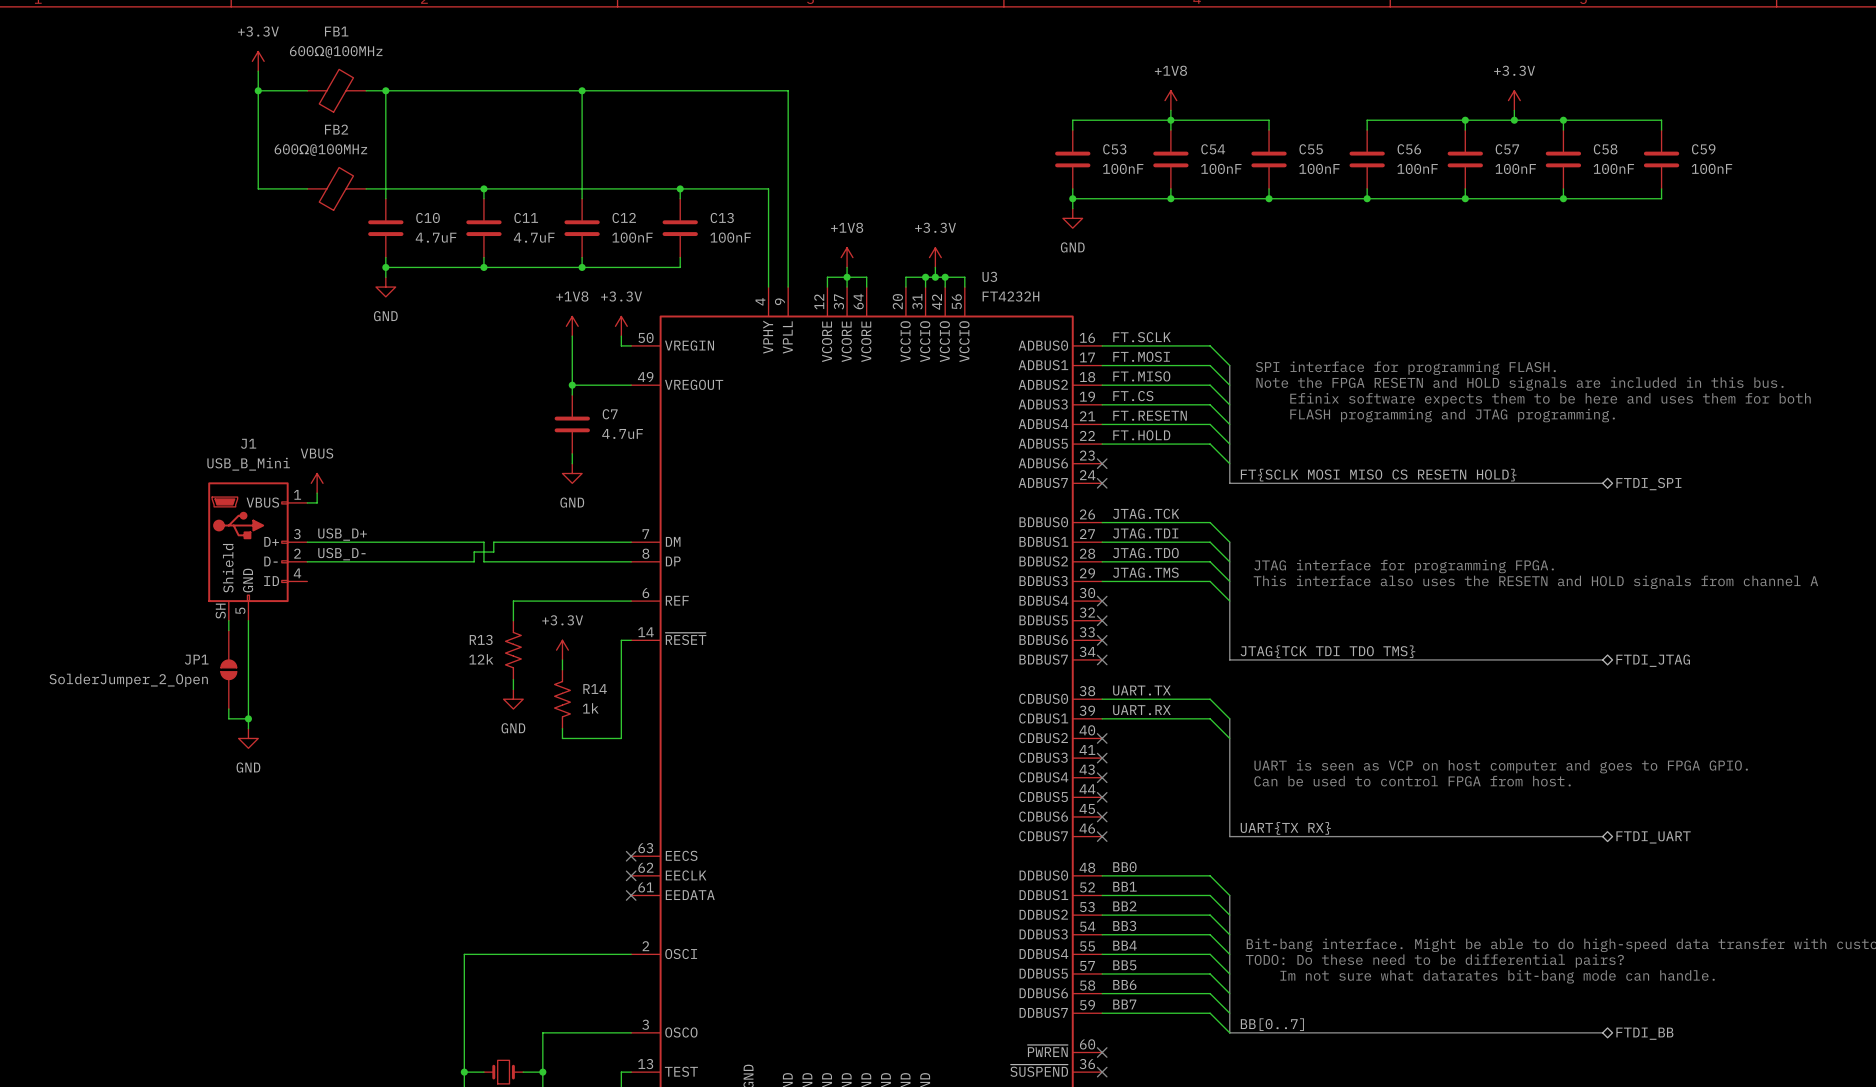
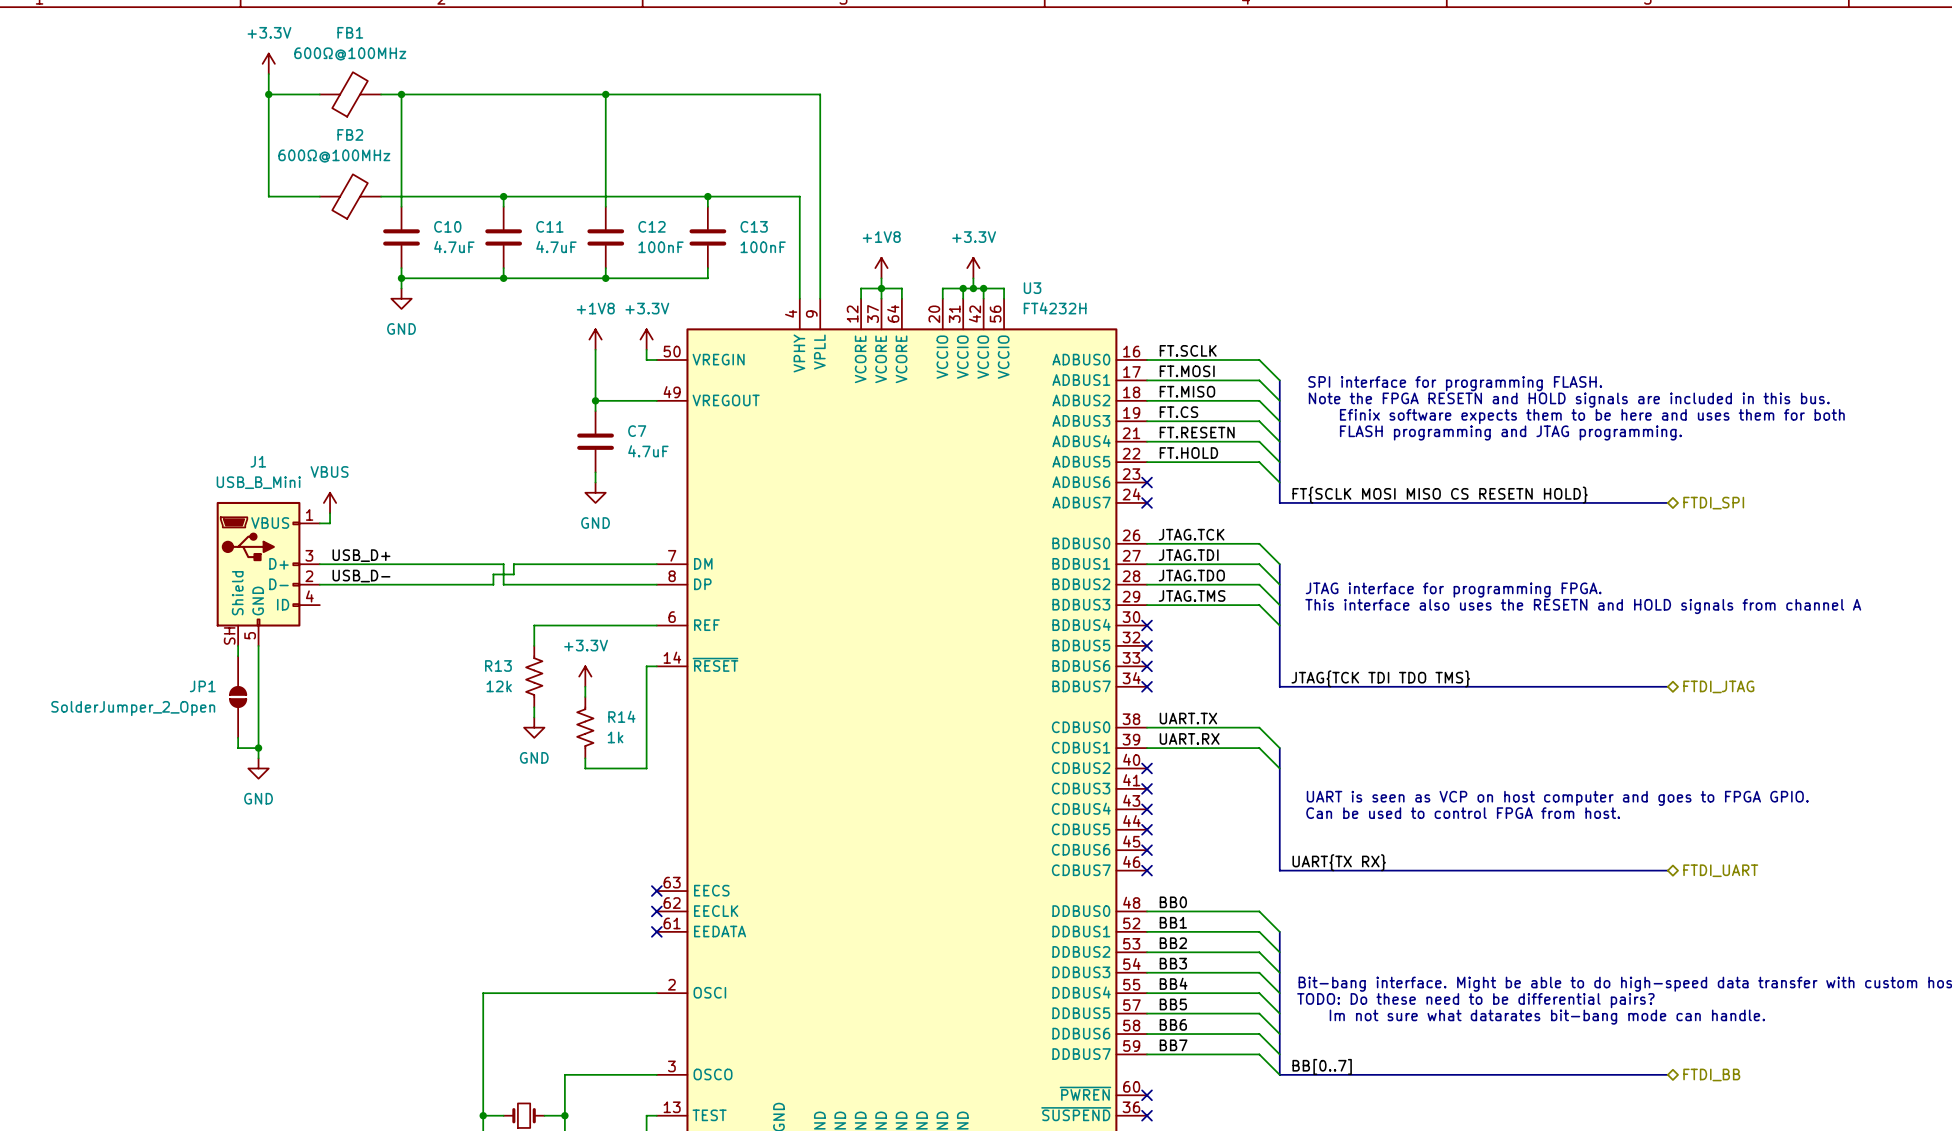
power symbol: +1V8 (1170, 100) -> none
power symbol: +3.3V (1514, 100) -> none
wire: (1170, 110) (1170, 130) -> none
wire: (1514, 110) (1514, 120) -> none
junction: (1170, 120) -> none
wire: (1465, 120) (1465, 130) -> none
junction: (1465, 120) -> none
junction: (1514, 120) -> none
wire: (1563, 120) (1563, 130) -> none
junction: (1563, 120) -> none
wire: (1072, 130) (1072, 120) (1269, 120) (1269, 130) -> none
wire: (1367, 130) (1367, 120) (1661, 120) (1661, 130) -> none
C53: 100nF (1072, 159) -> none
C54: 100nF (1170, 159) -> none
C55: 100nF (1269, 159) -> none
C56: 100nF (1367, 159) -> none
C57: 100nF (1465, 159) -> none
C58: 100nF (1563, 159) -> none
C59: 100nF (1661, 159) -> none
wire: (1072, 188) (1072, 208) -> none
wire: (1170, 188) (1170, 198) -> none
wire: (1269, 188) (1269, 198) -> none
wire: (1367, 188) (1367, 198) -> none
wire: (1465, 188) (1465, 198) -> none
wire: (1563, 188) (1563, 198) -> none
wire: (1661, 188) (1661, 198) (1072, 198) -> none
junction: (1072, 198) -> none
junction: (1170, 198) -> none
junction: (1269, 198) -> none
junction: (1367, 198) -> none
junction: (1465, 198) -> none
junction: (1563, 198) -> none
power symbol: GND (1072, 218) -> none

